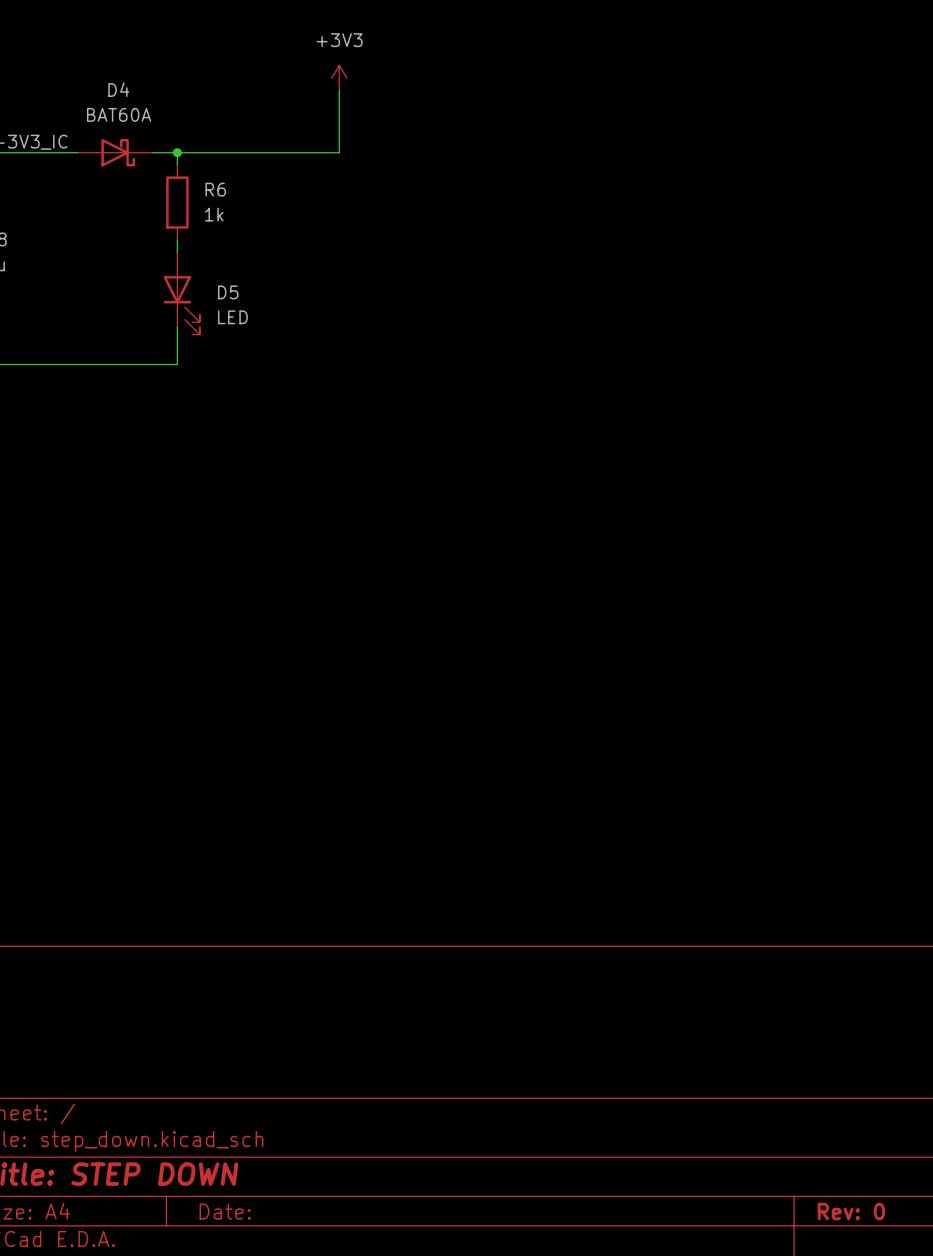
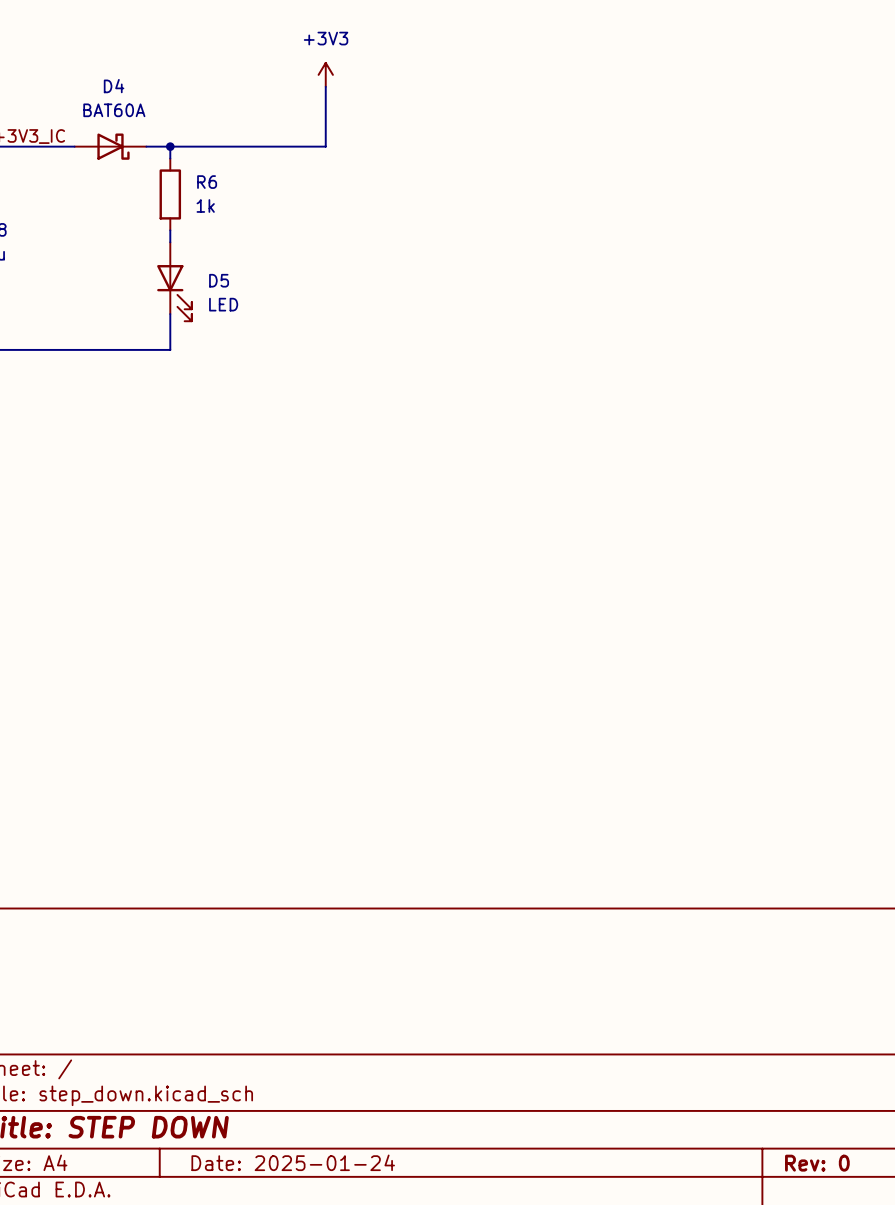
title block: Date: (225, 1211) -> Date: 2025-01-24 (293, 1162)

